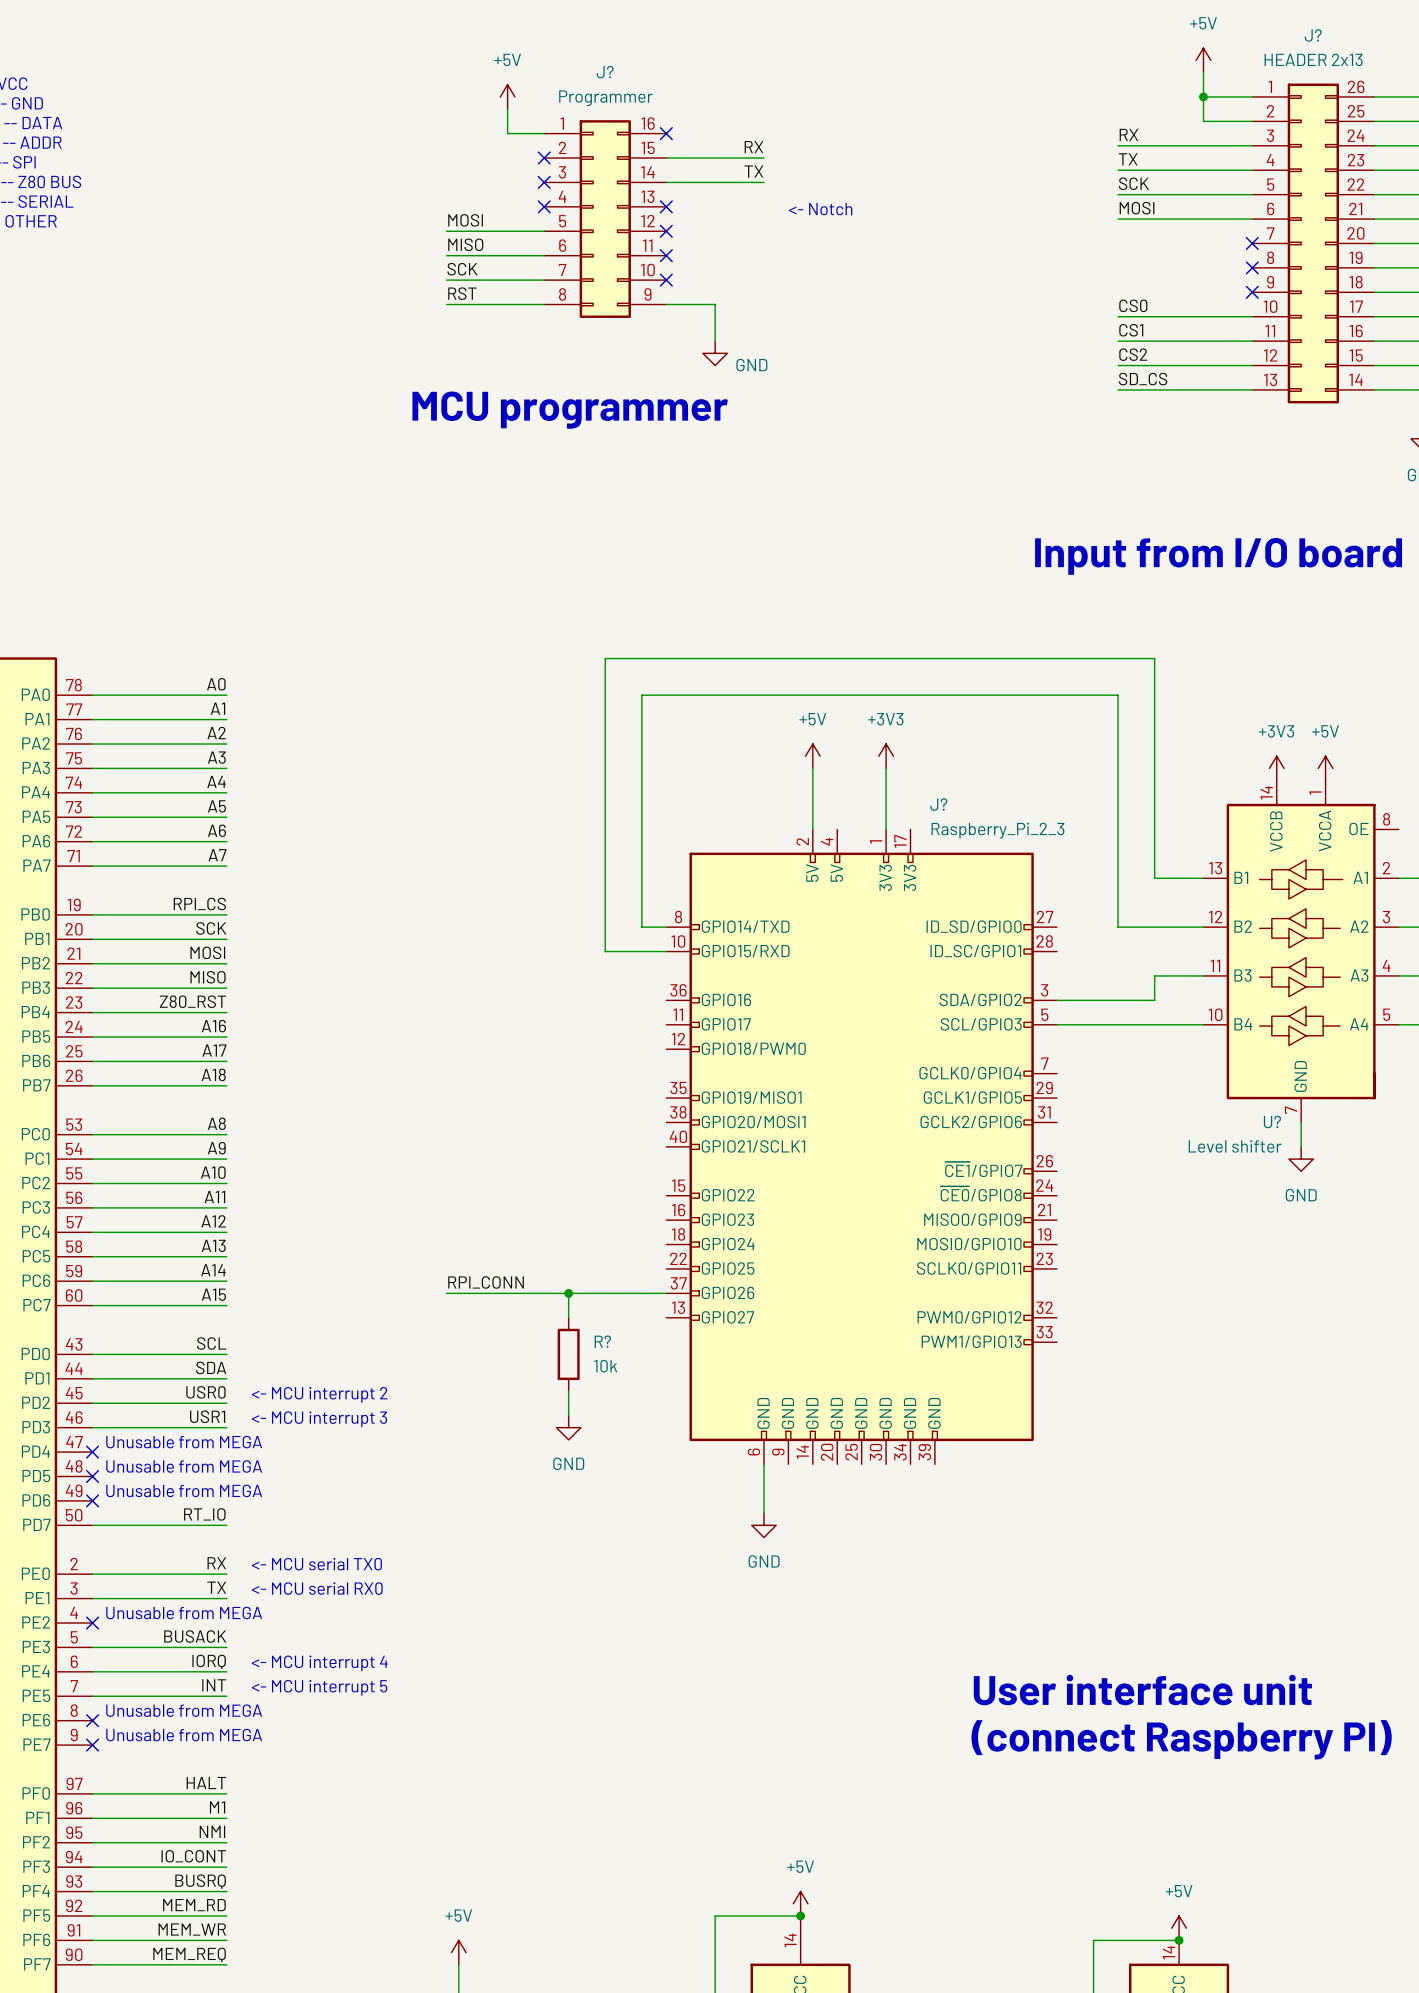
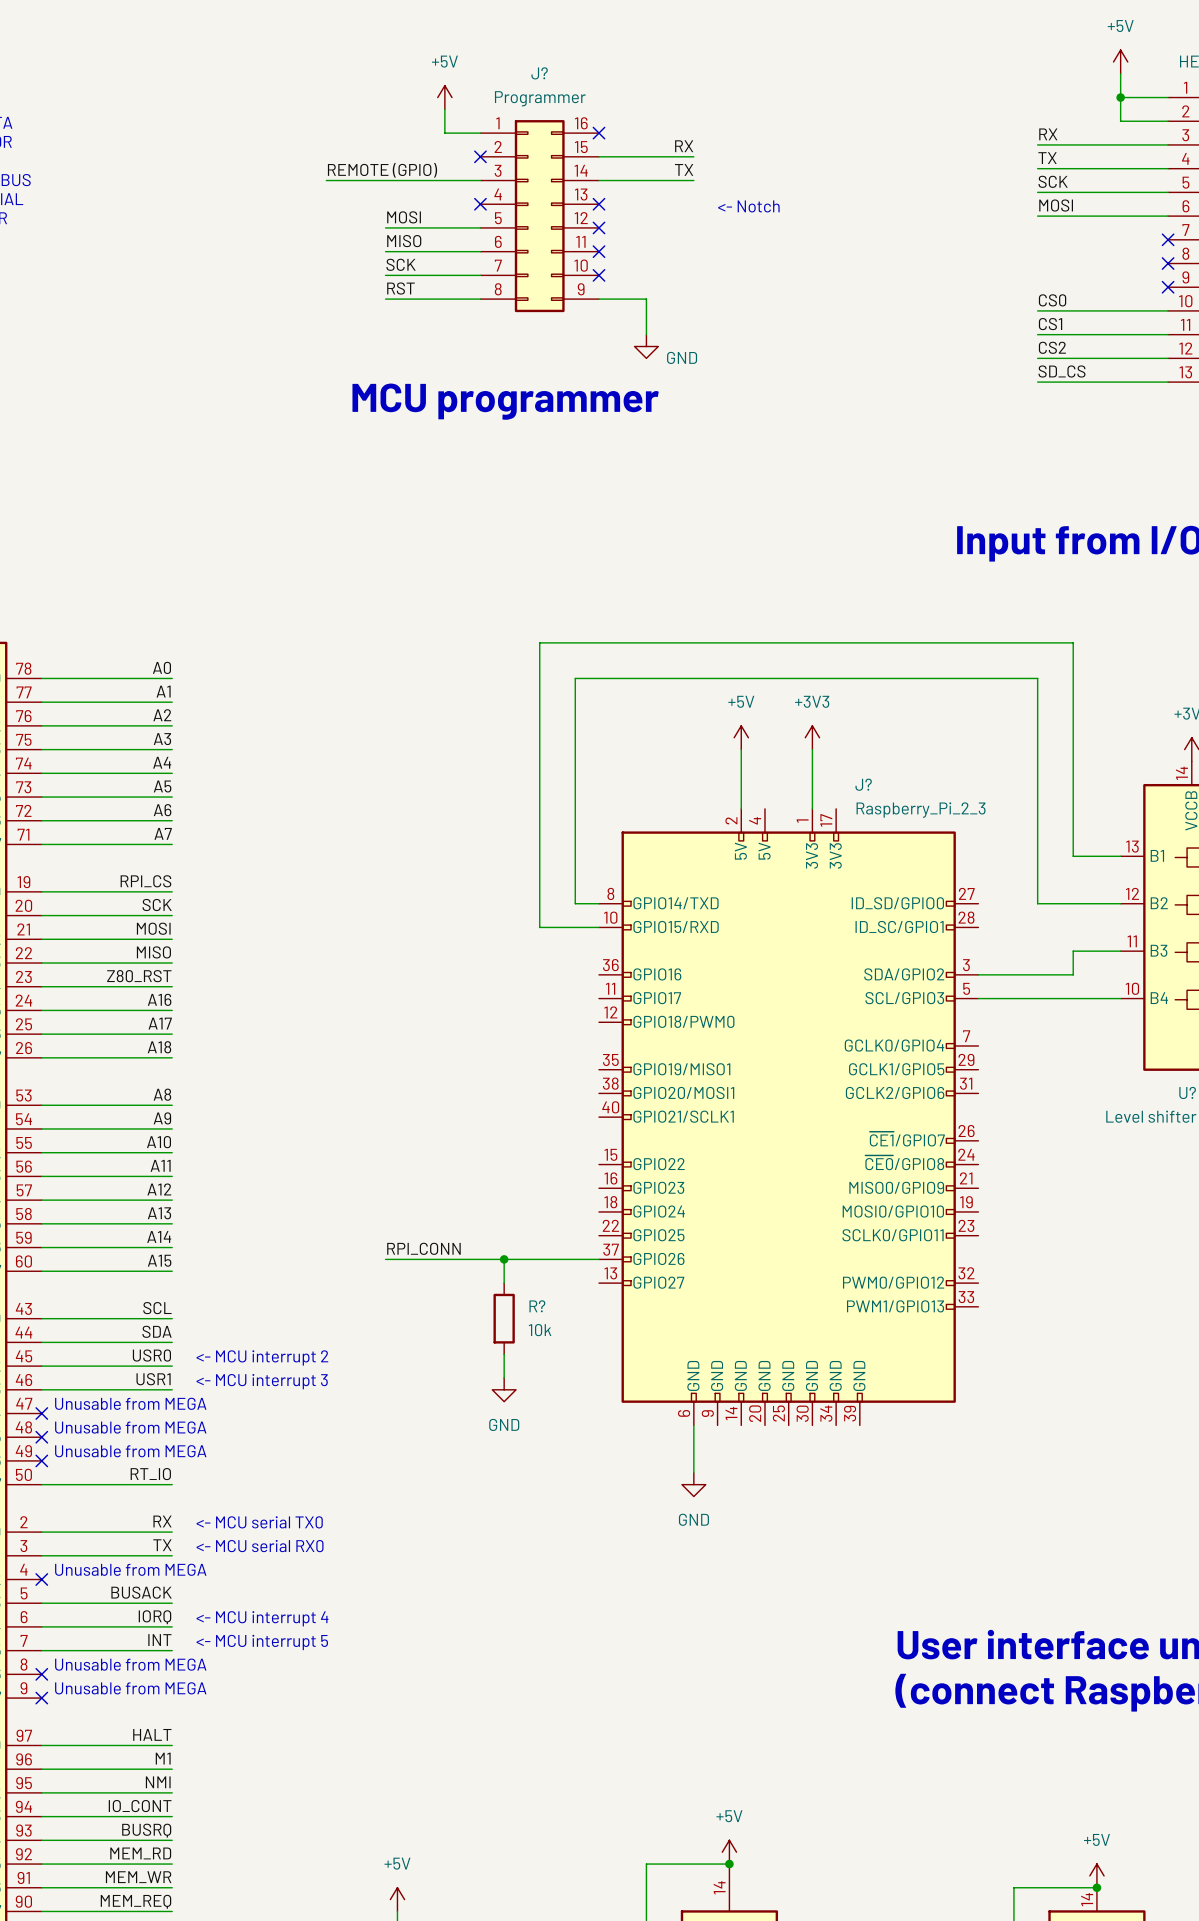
label: none -> REMOTE (GPIO) (382, 170)
wire: none -> (326, 180) (480, 180)
no-connect mark: (544, 182) -> none

